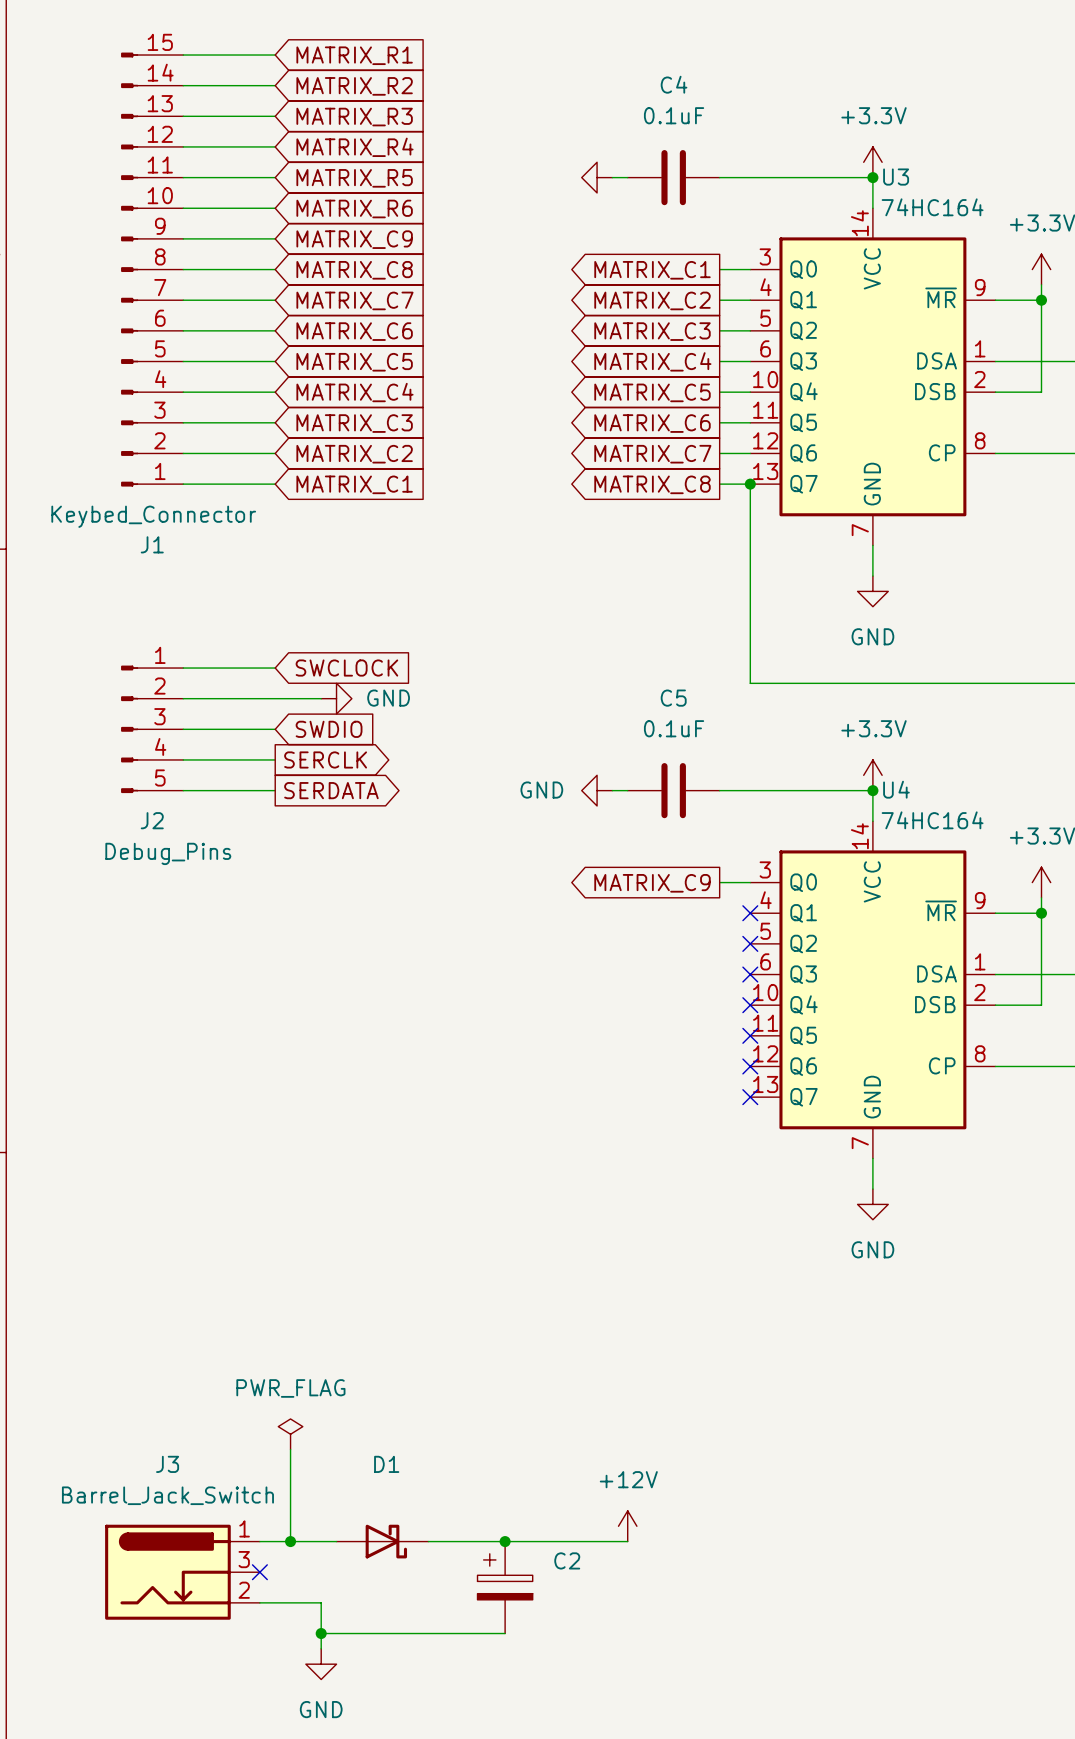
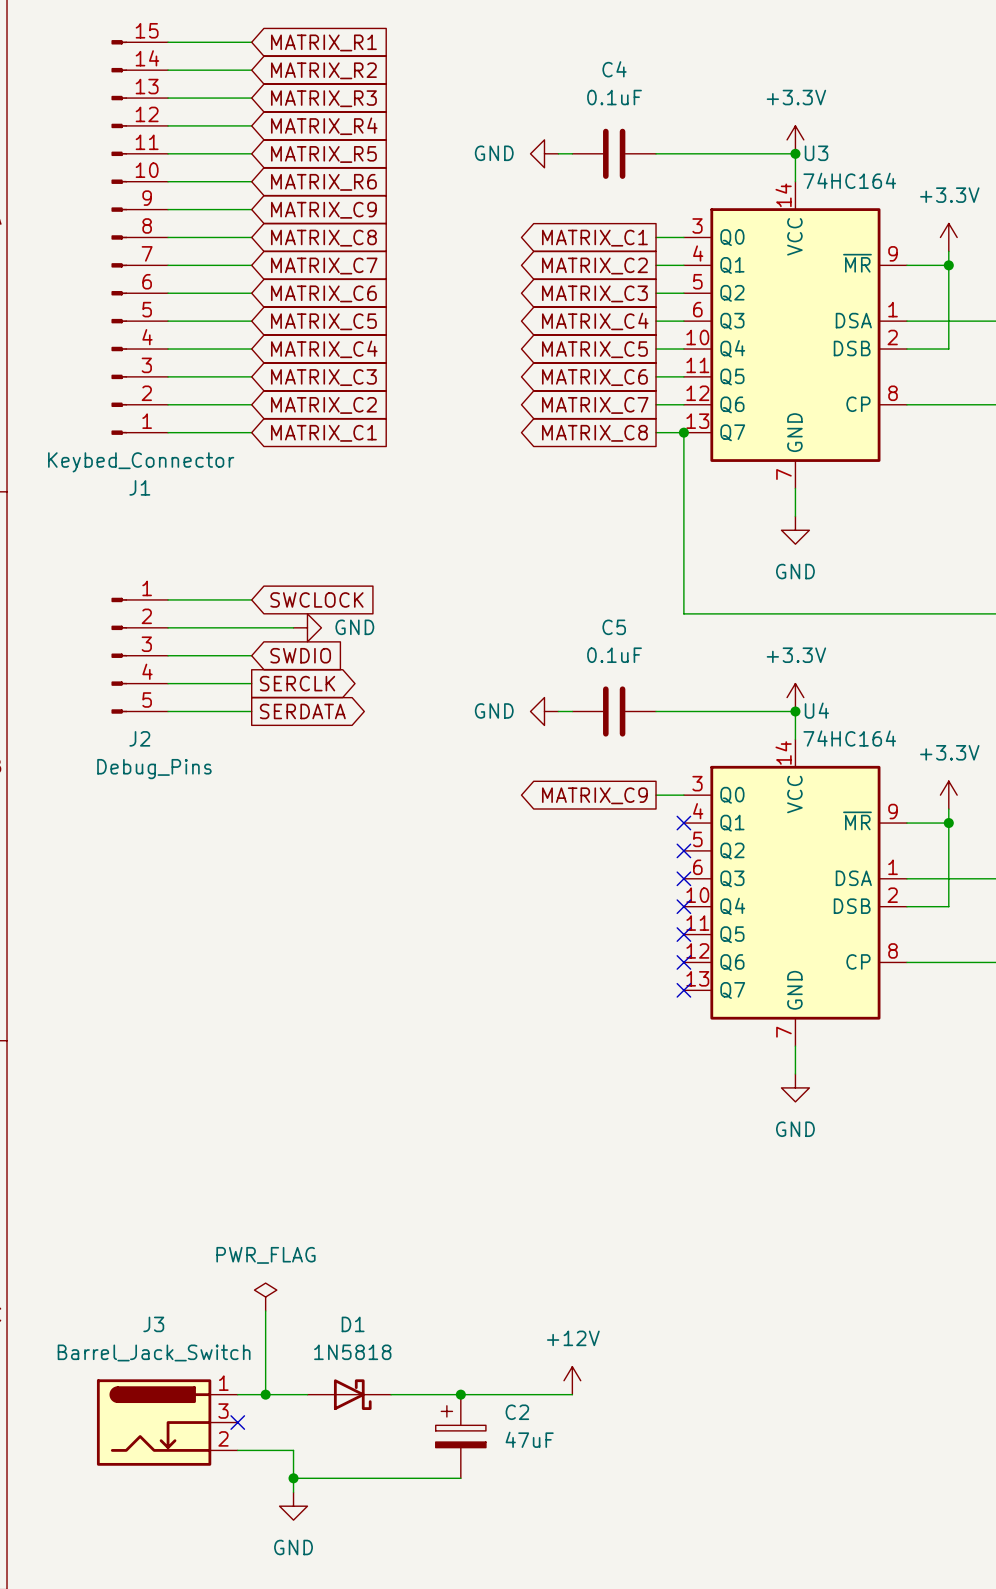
power symbol text: none -> GND (494, 153)
D1 value: none -> 1N5818 (352, 1352)
C2 value: none -> 47uF (529, 1439)

